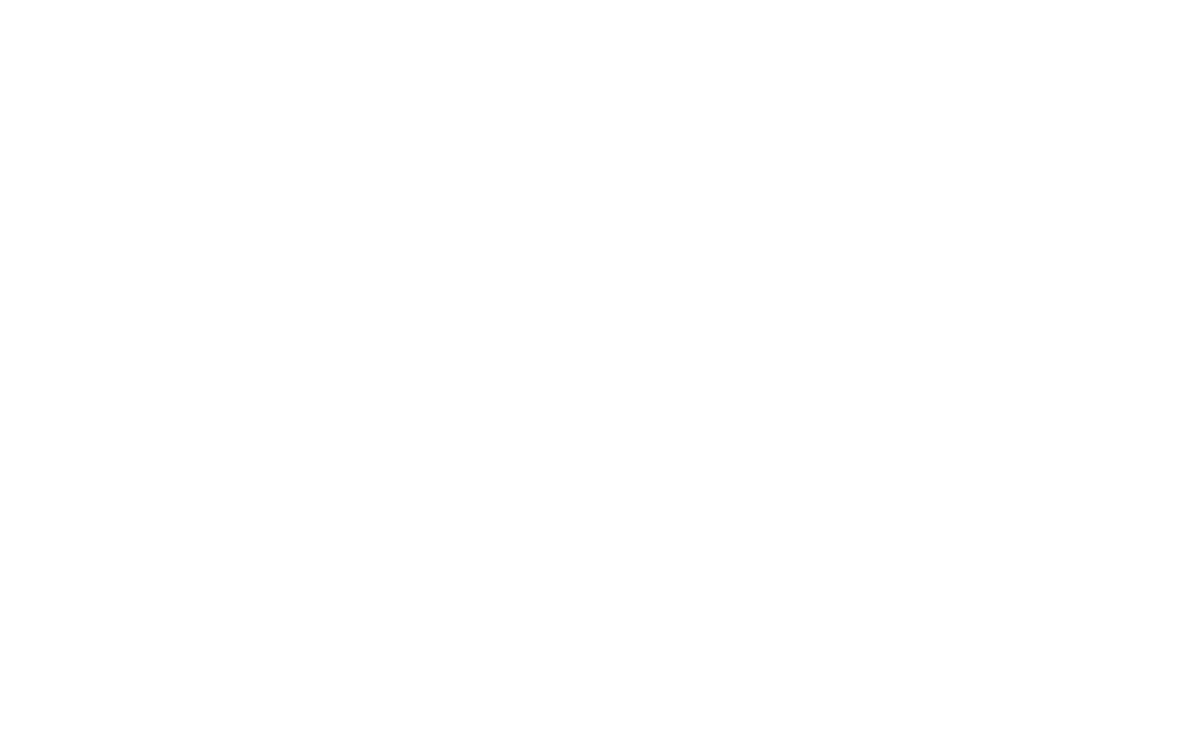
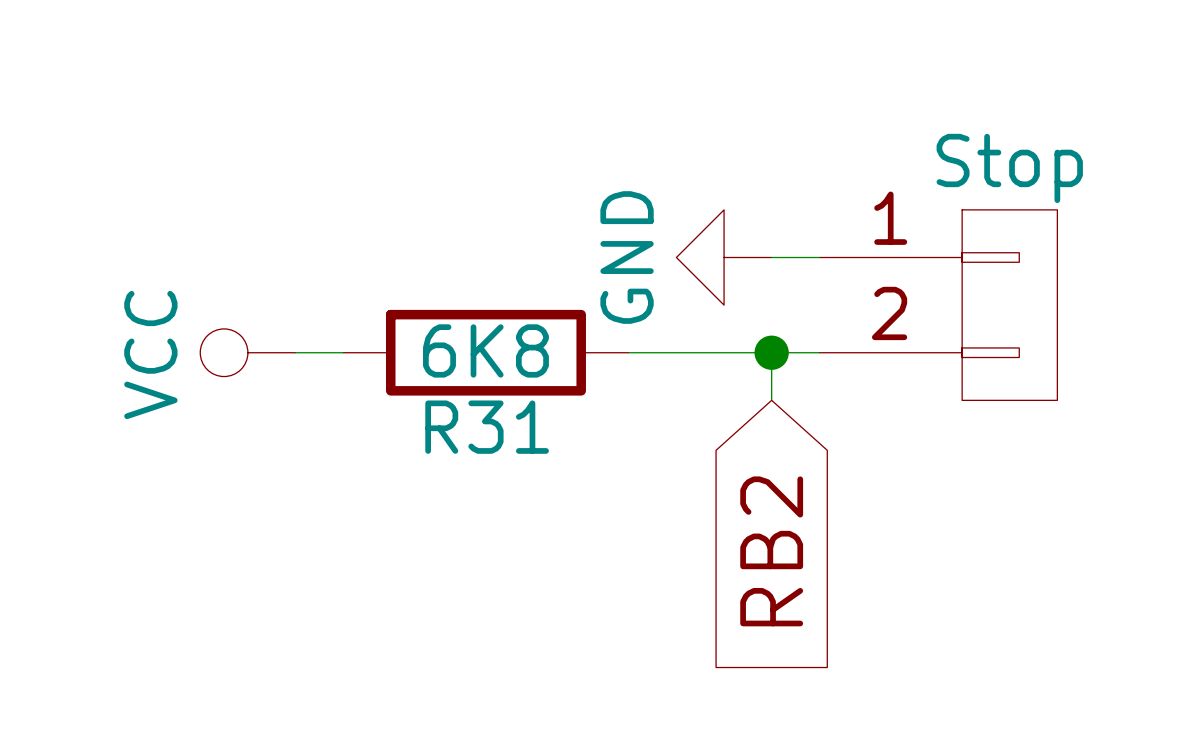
power symbol: none -> GND (724, 257)
wire: none -> (771, 257) (819, 257)
Stop: none -> (938, 305)
power symbol: none -> VCC (247, 352)
wire: none -> (295, 352) (343, 352)
R31: none -> 6K8 (485, 352)
wire: none -> (628, 352) (819, 352)
wire: none -> (771, 352) (771, 400)
junction: none -> (771, 352)
global label: none -> RB2 (771, 551)

